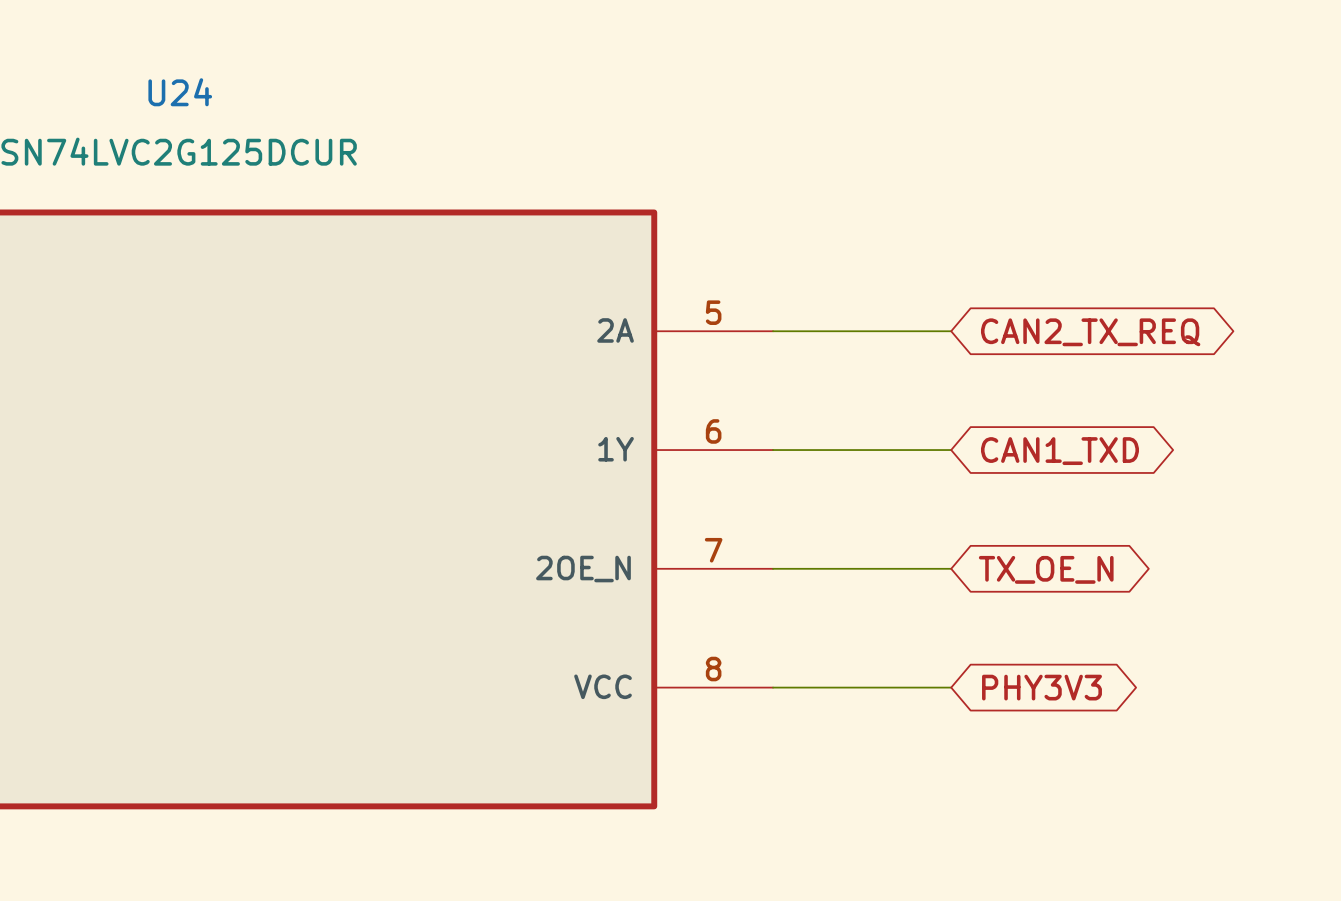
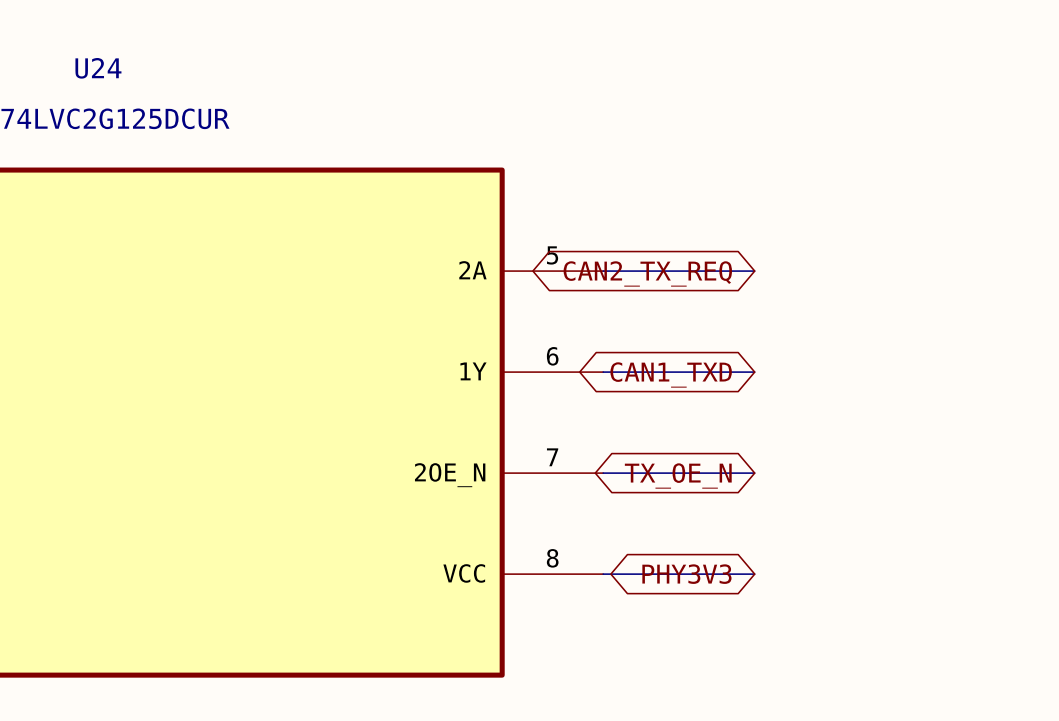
global label rotation: 0° (1090, 332) -> 180° (647, 273)
global label rotation: 0° (1059, 451) -> 180° (671, 374)
global label rotation: 0° (1046, 569) -> 180° (678, 475)
global label rotation: 0° (1041, 687) -> 180° (686, 574)
global label position: PHY3V3 (1041, 687) -> PHY3V3 (686, 574)

